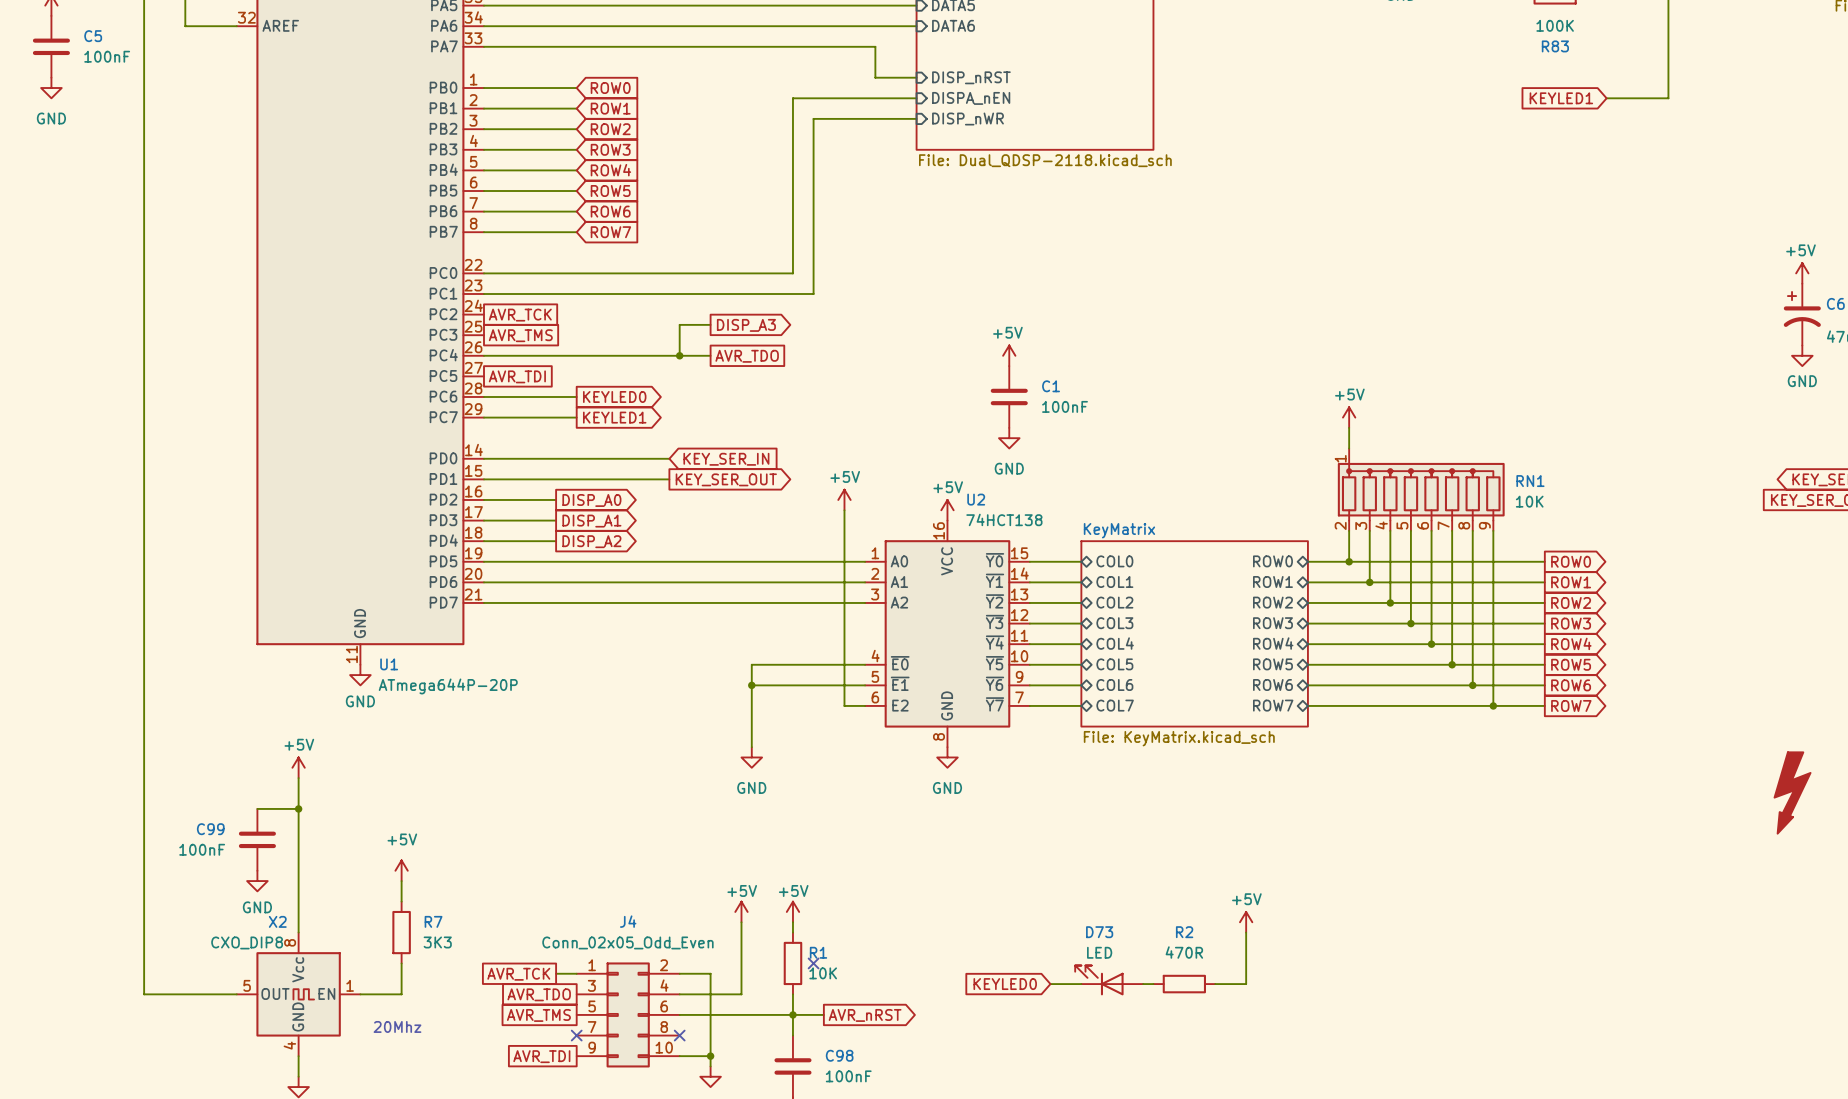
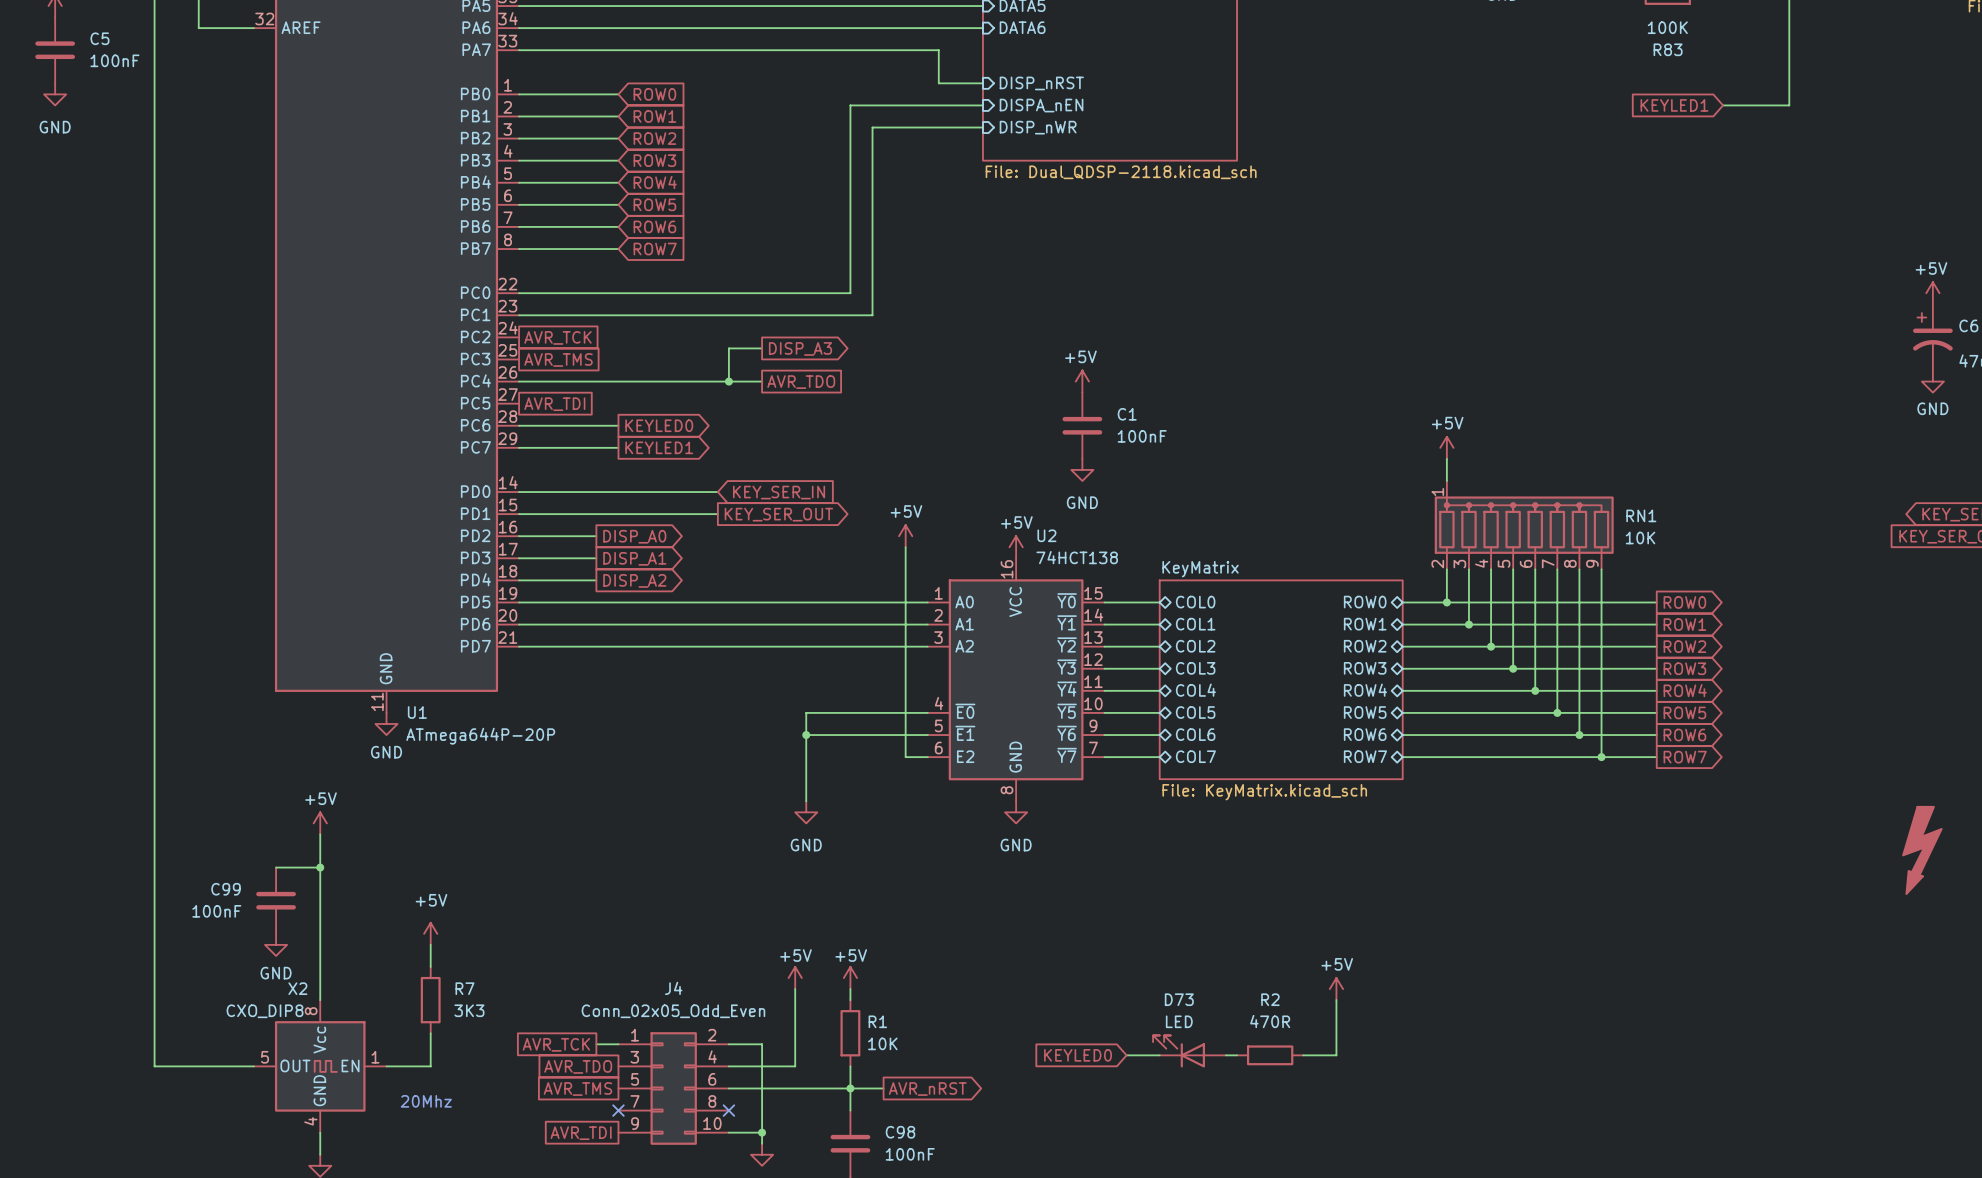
no-connect mark: (813, 963) -> none

